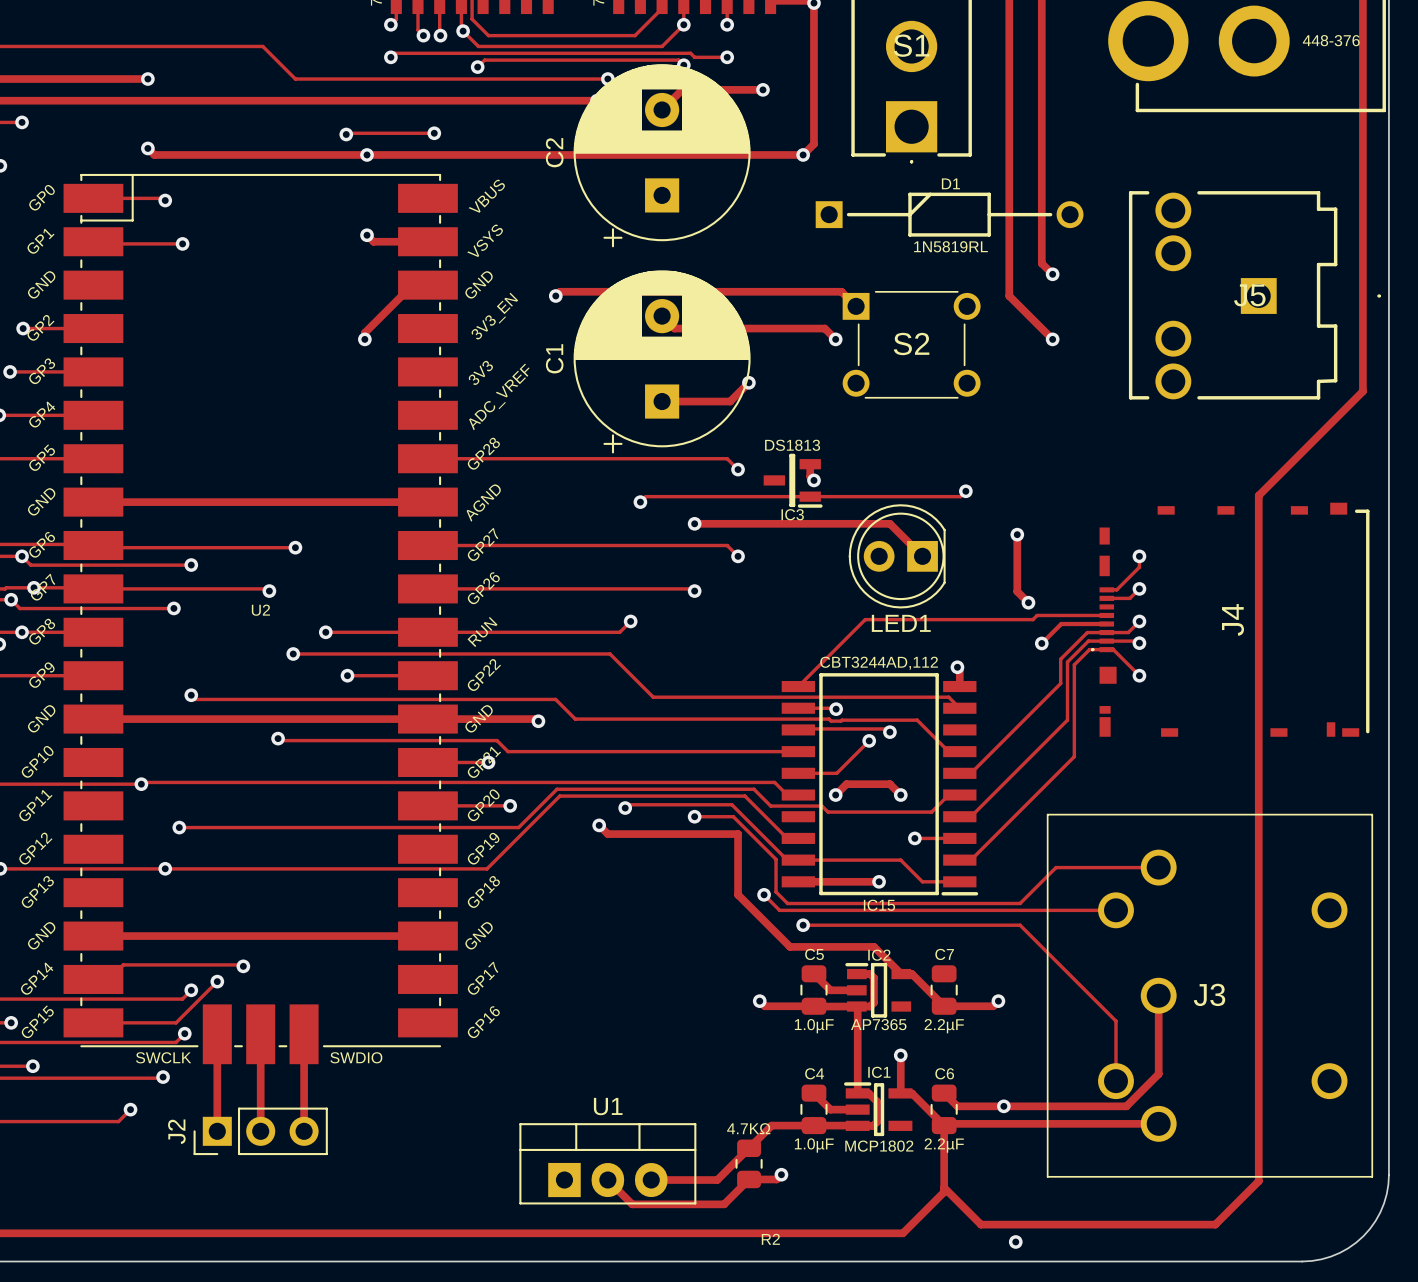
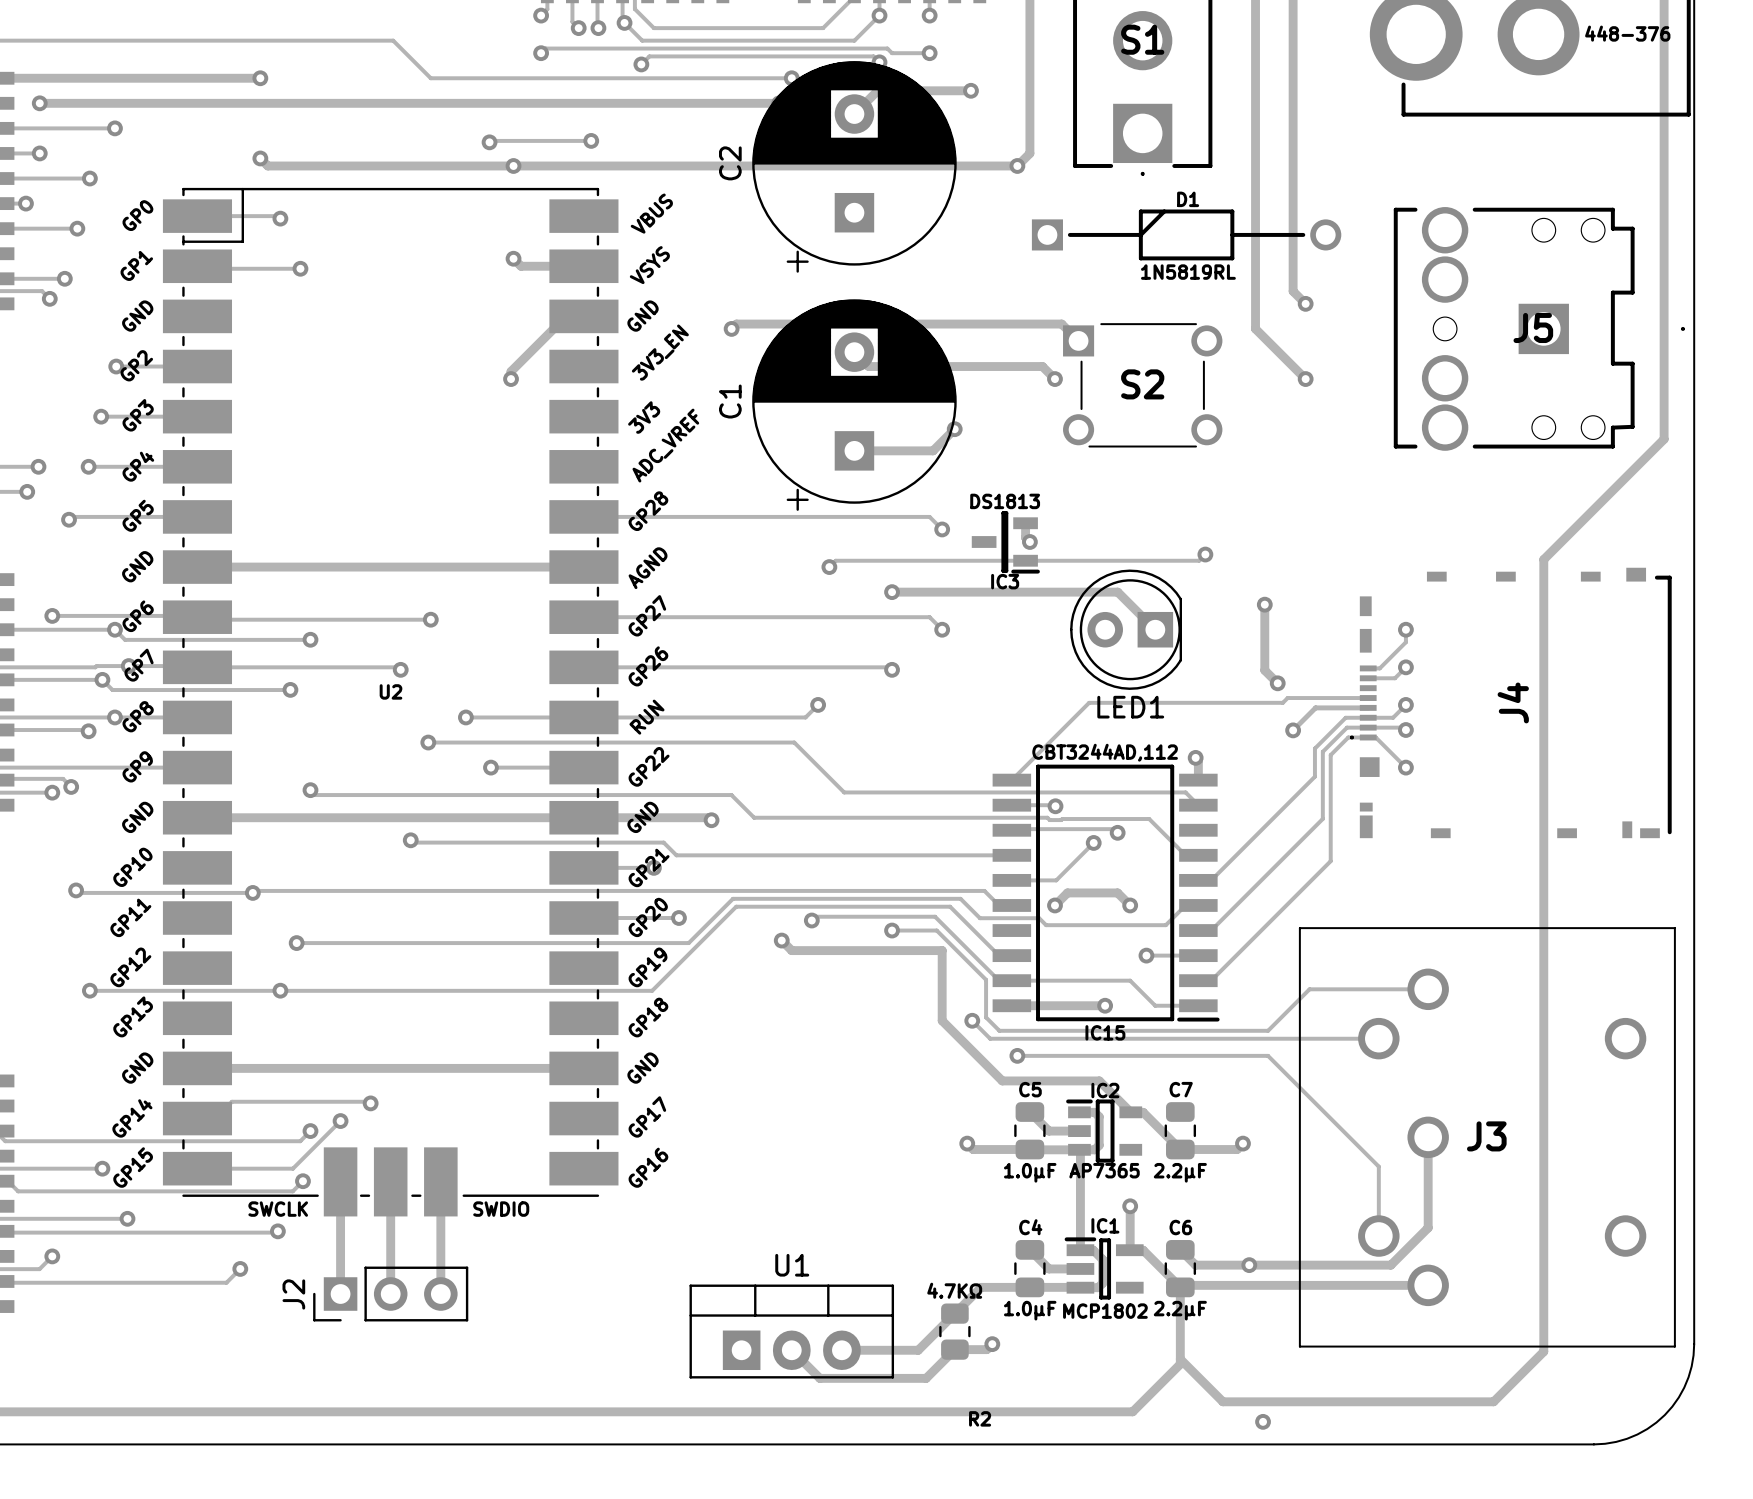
J5 footprint: [1128, 191, 1381, 400] -> [1393, 207, 1685, 451]

